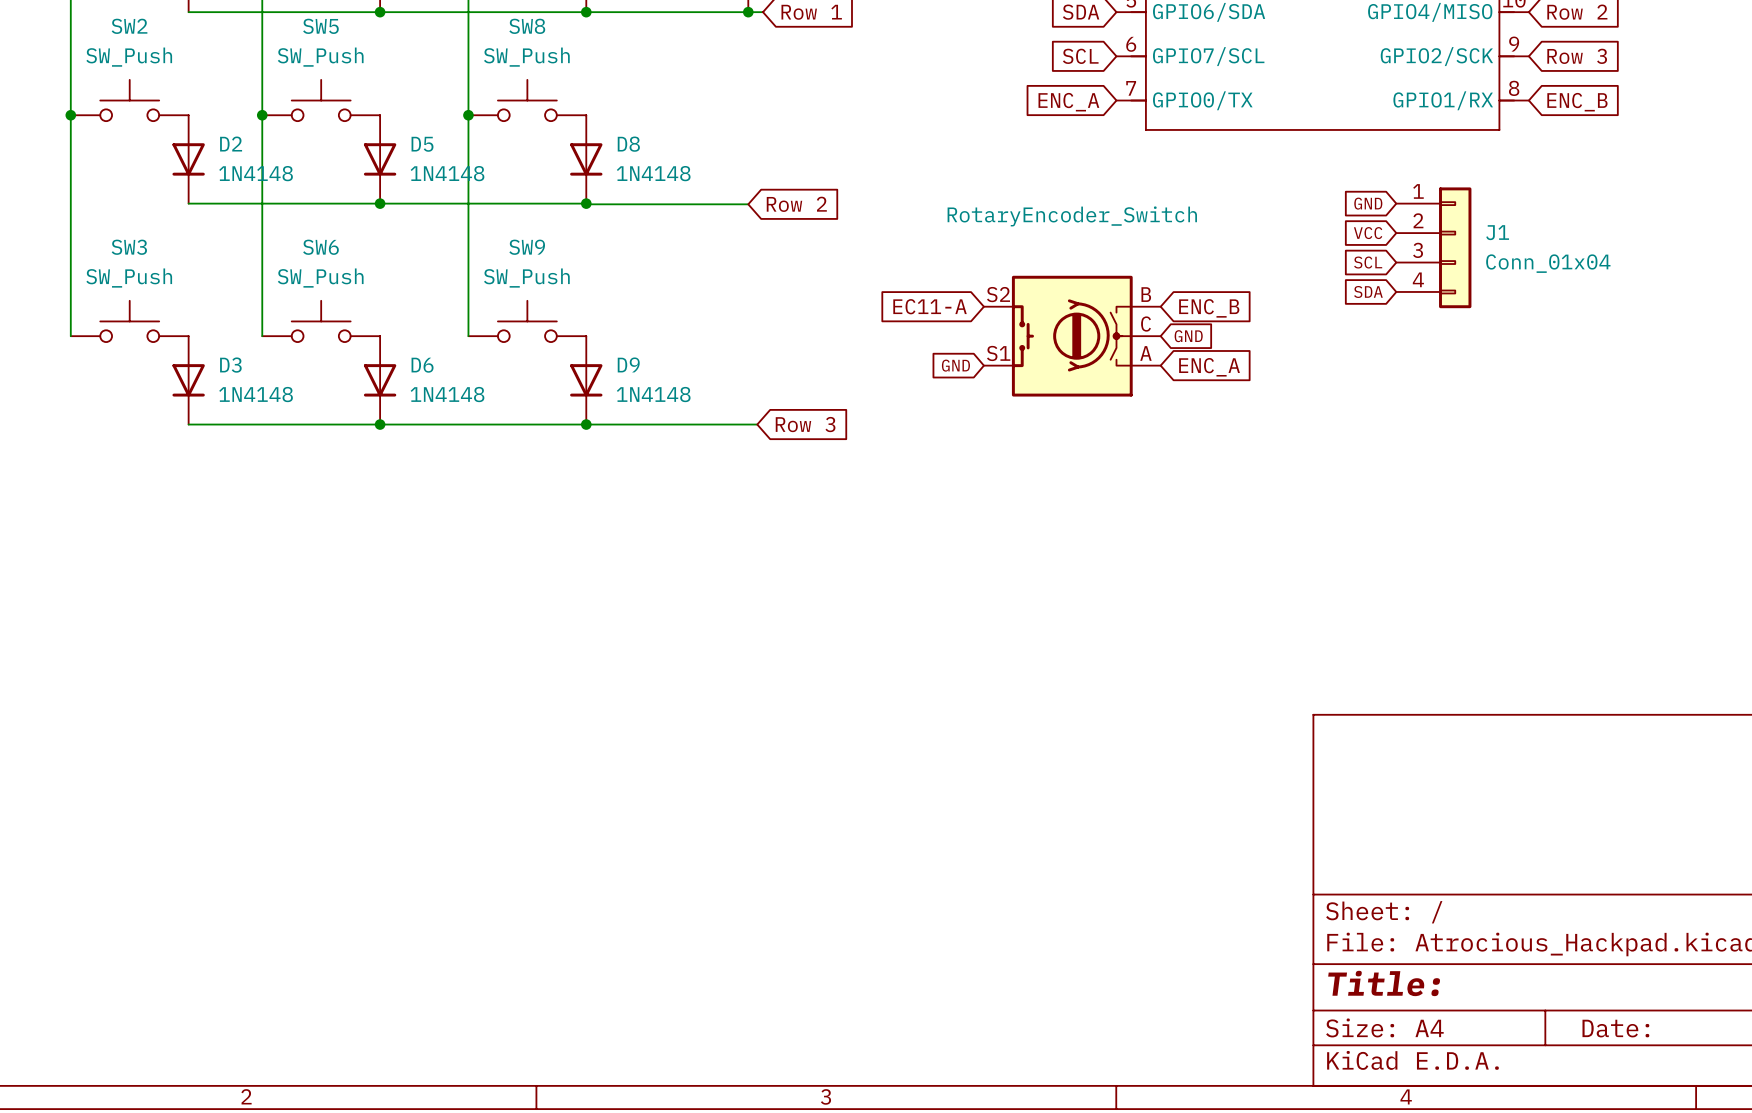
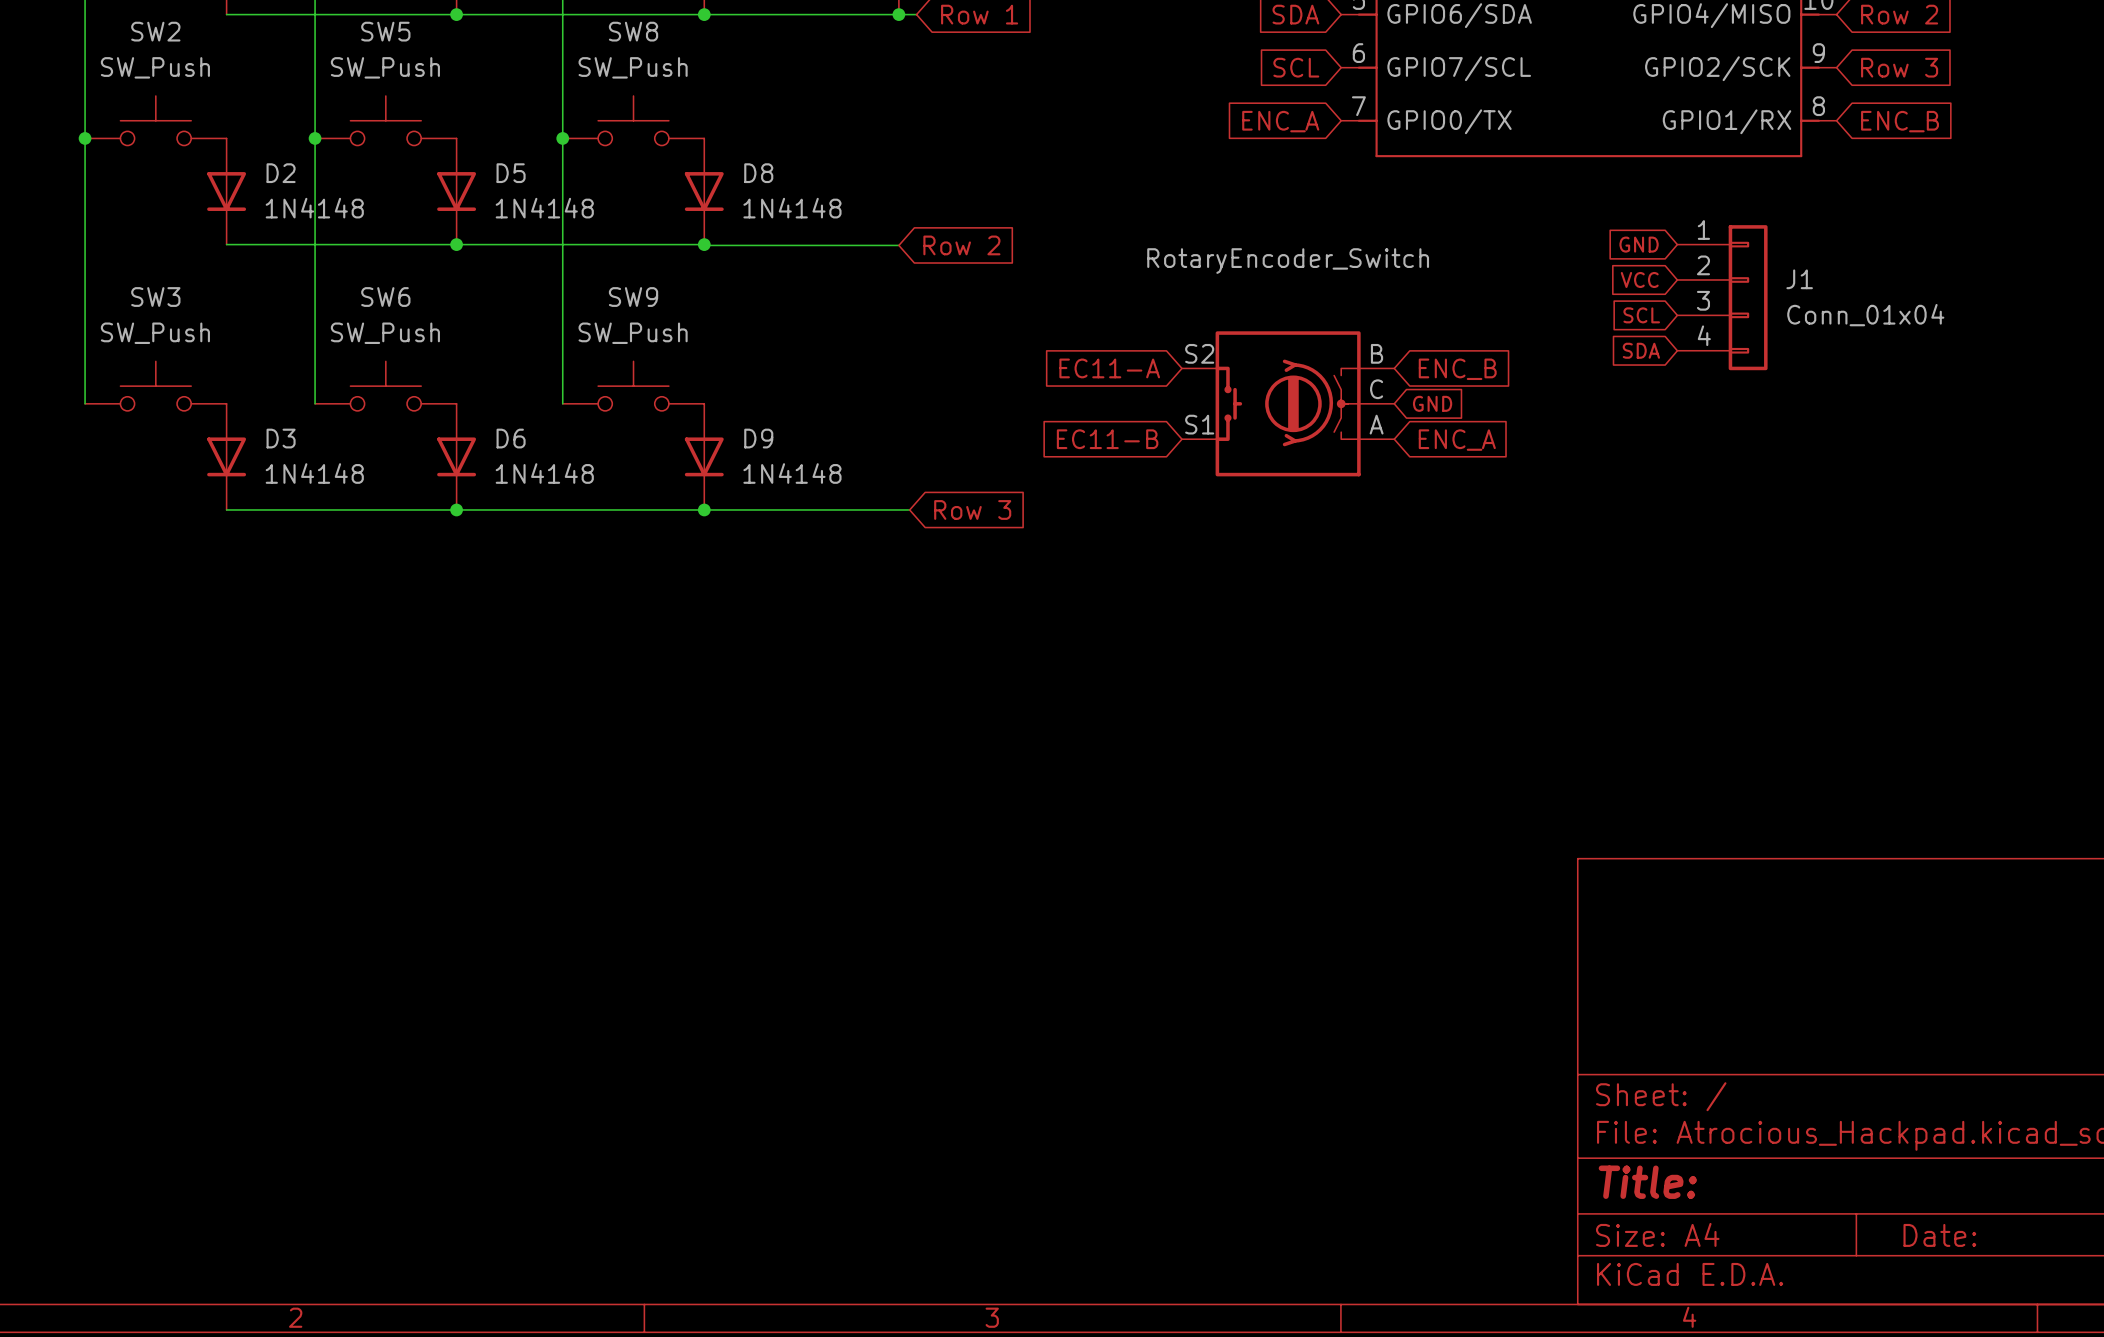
global label: GND (955, 365) -> EC11-B (1107, 439)

